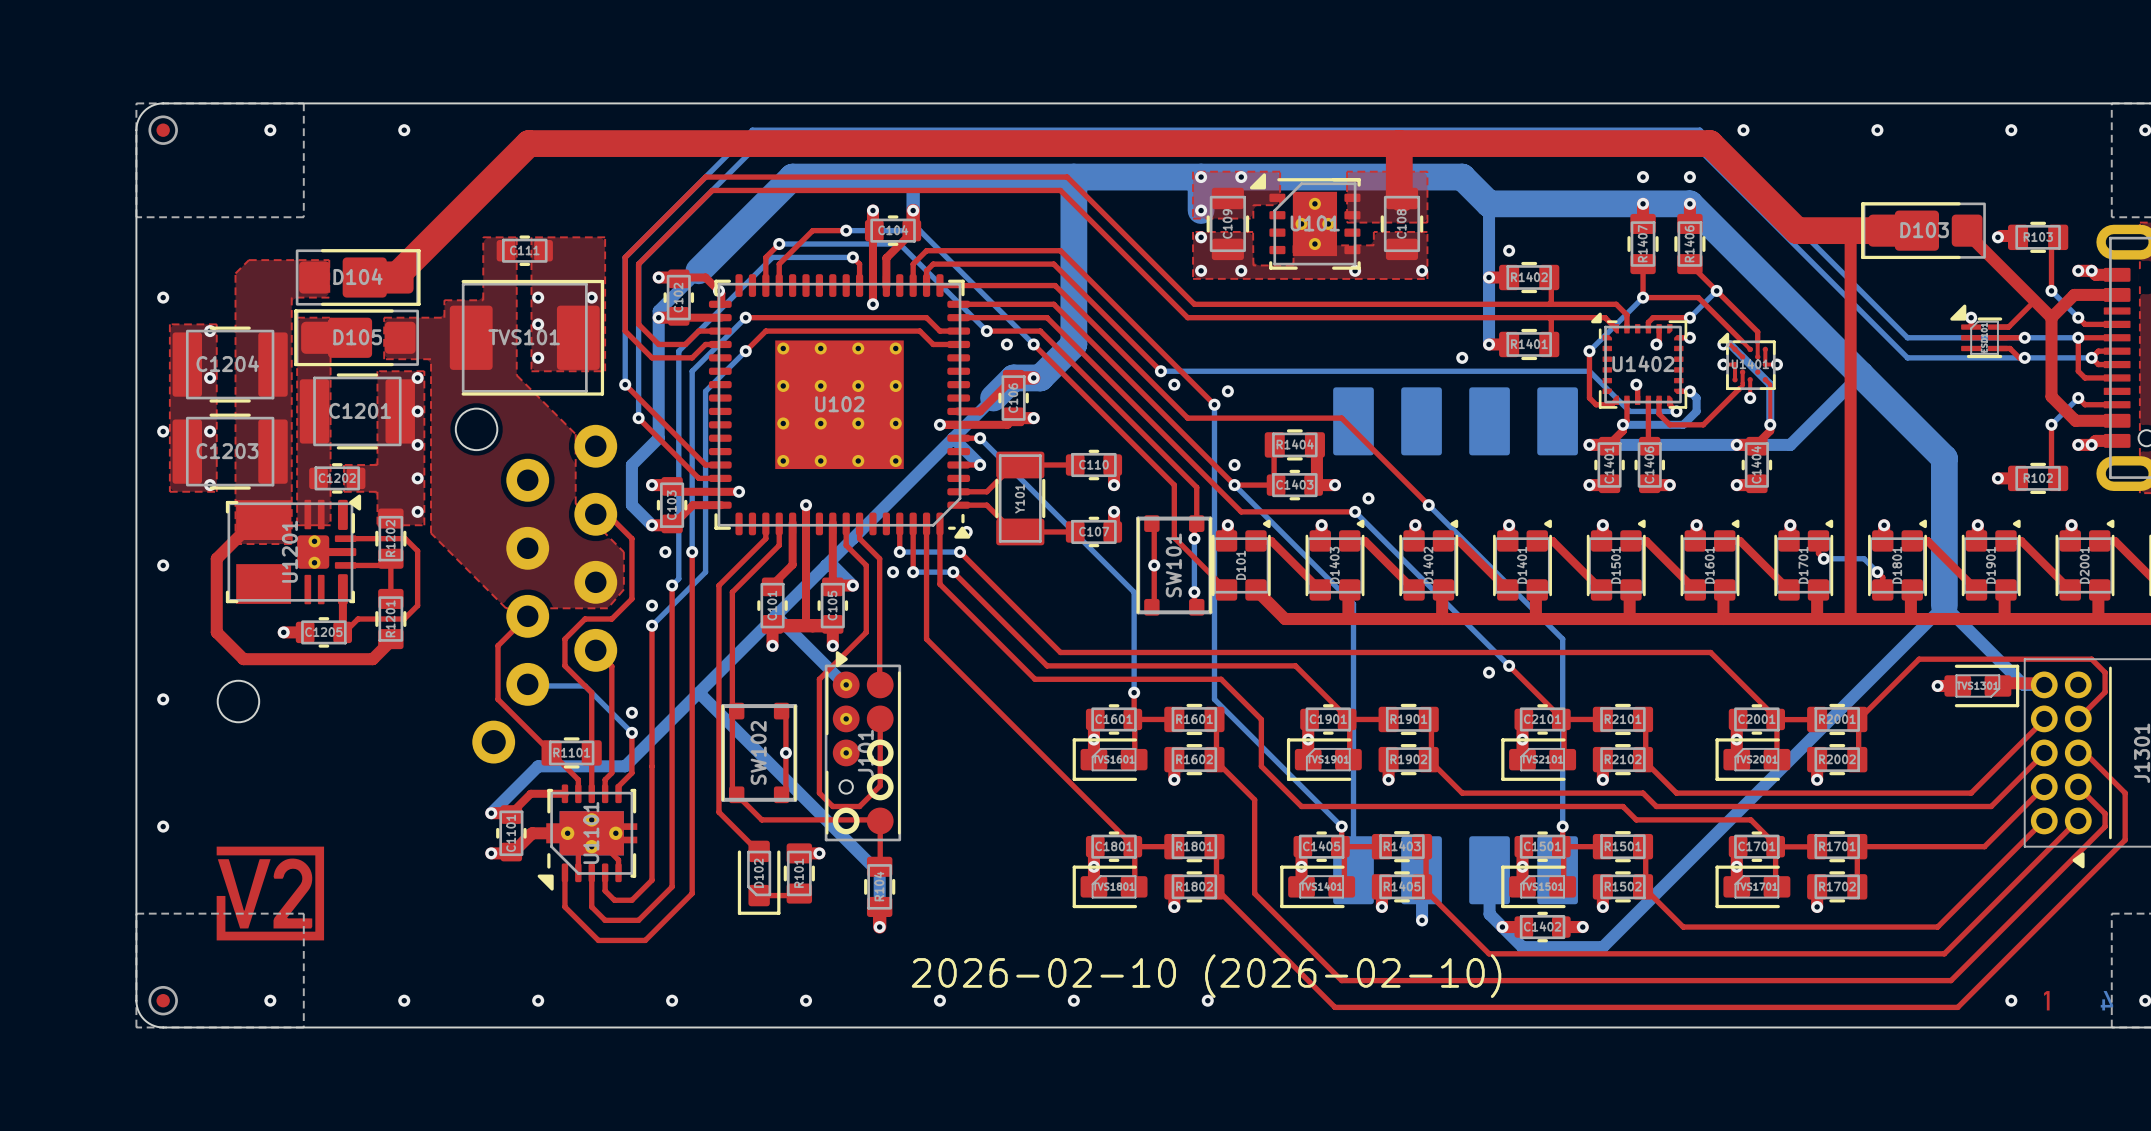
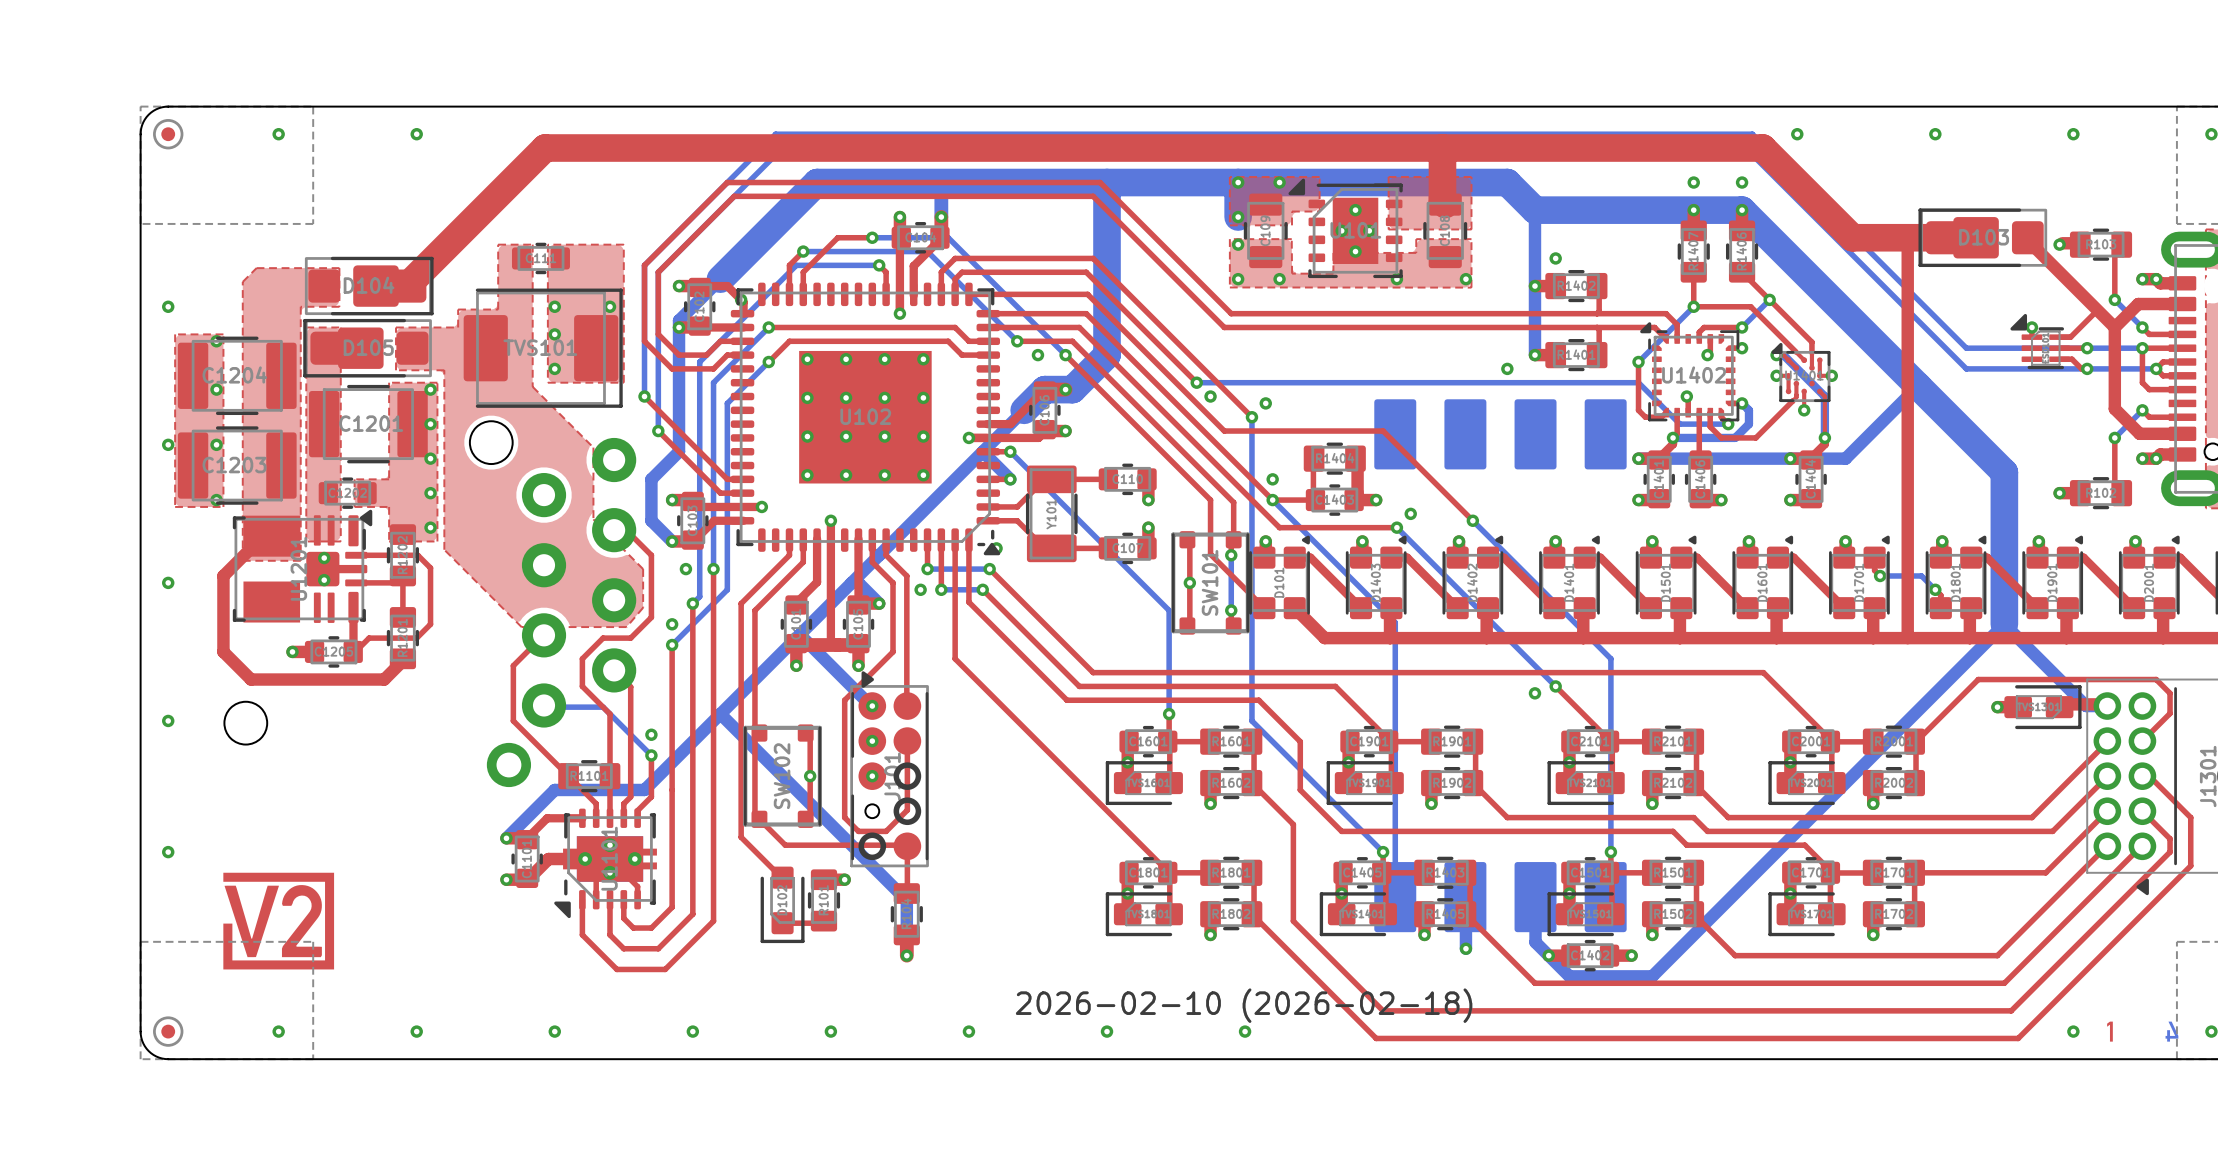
drawing shape: [911, 954, 1502, 998] -> [1015, 988, 1473, 1023]

